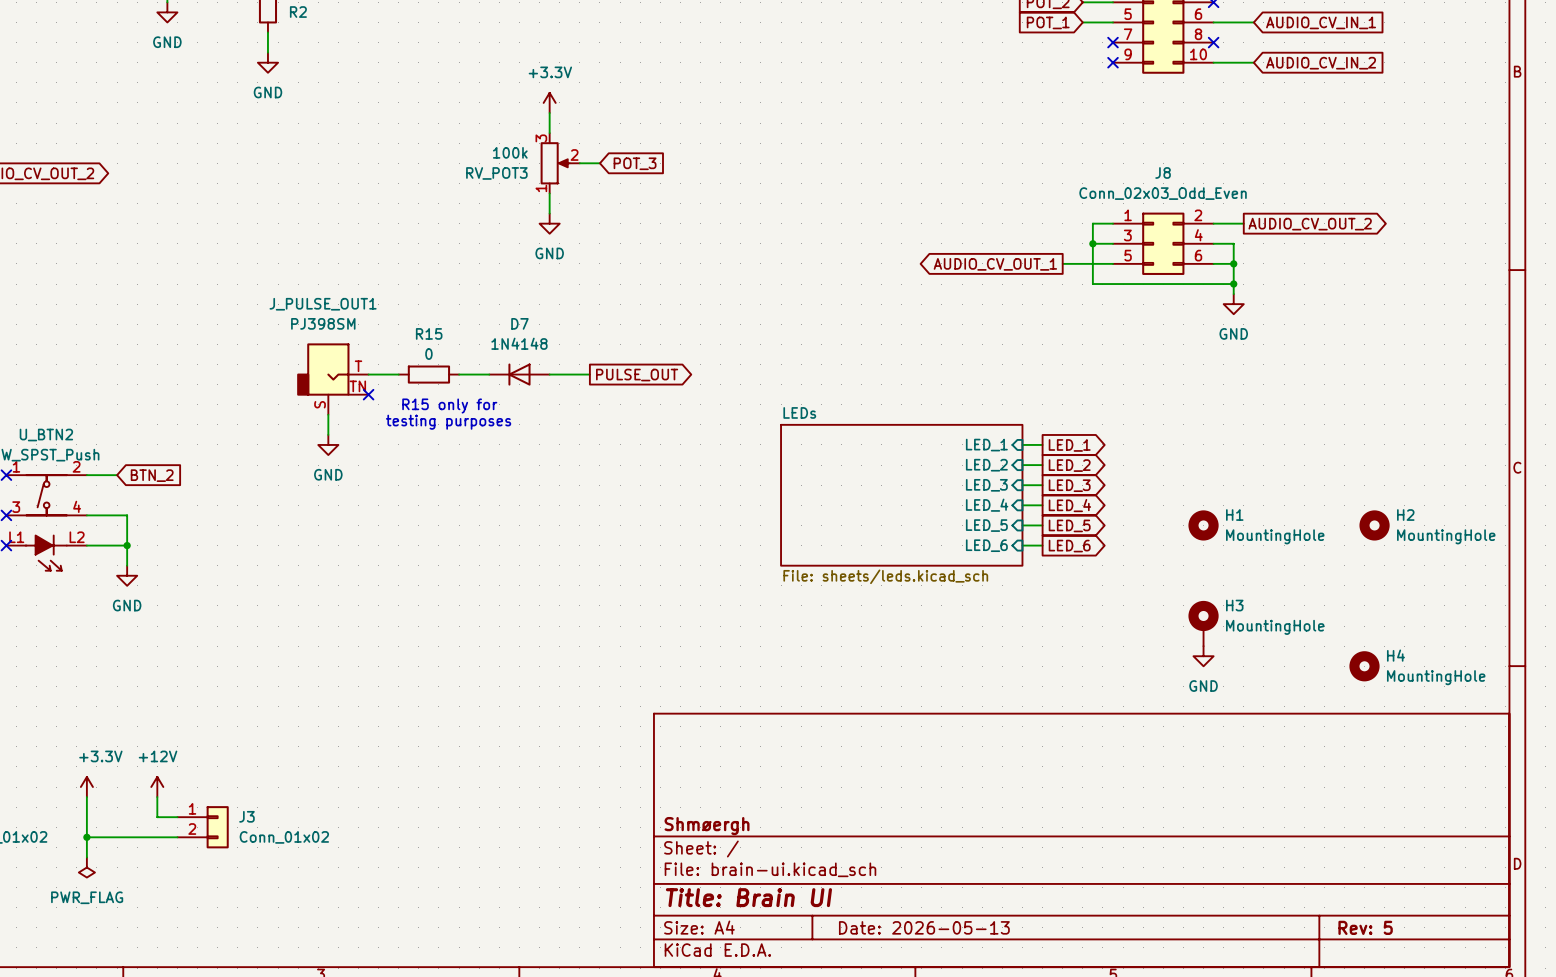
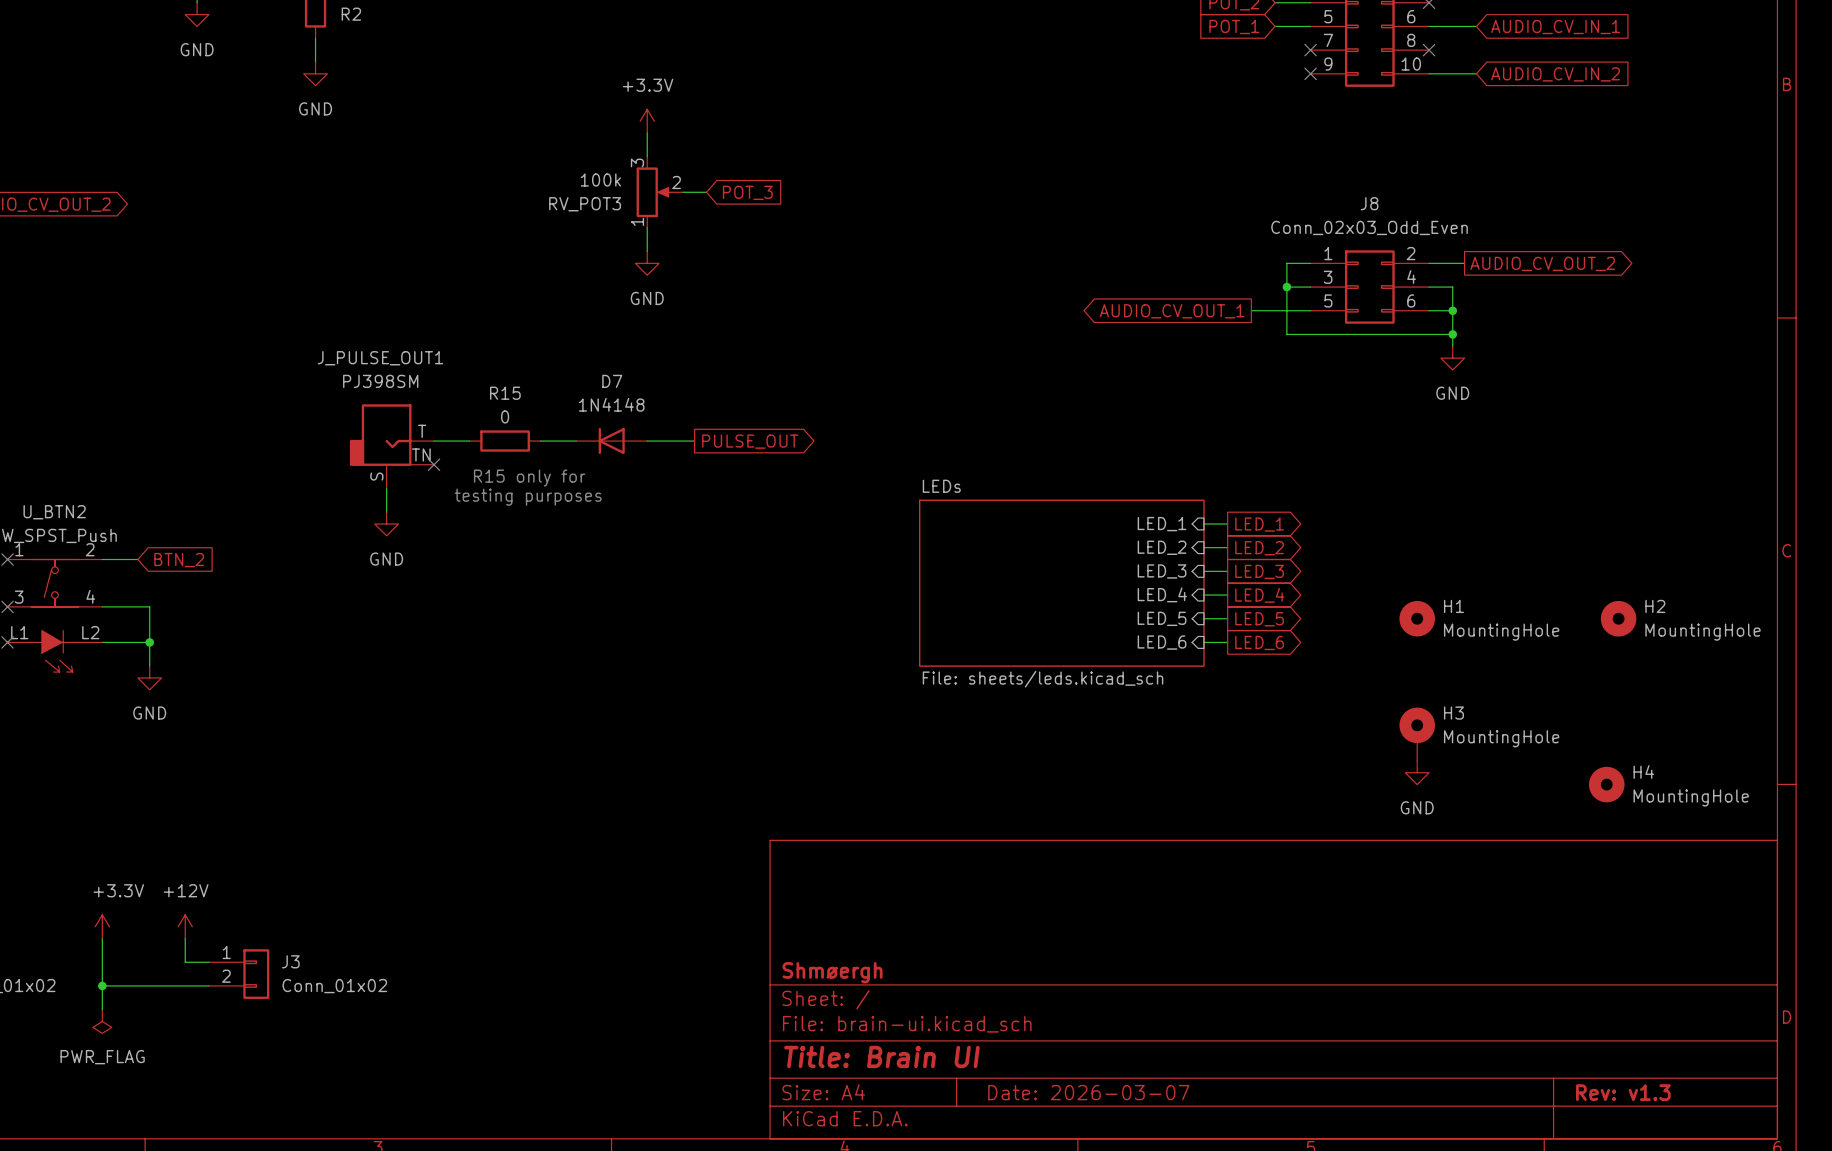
title block: Date: 2026-05-13 (924, 927) -> Date: 2026-03-07 (1088, 1092)
title block: Rev: 5 (1365, 927) -> Rev: v1.3 (1623, 1092)

